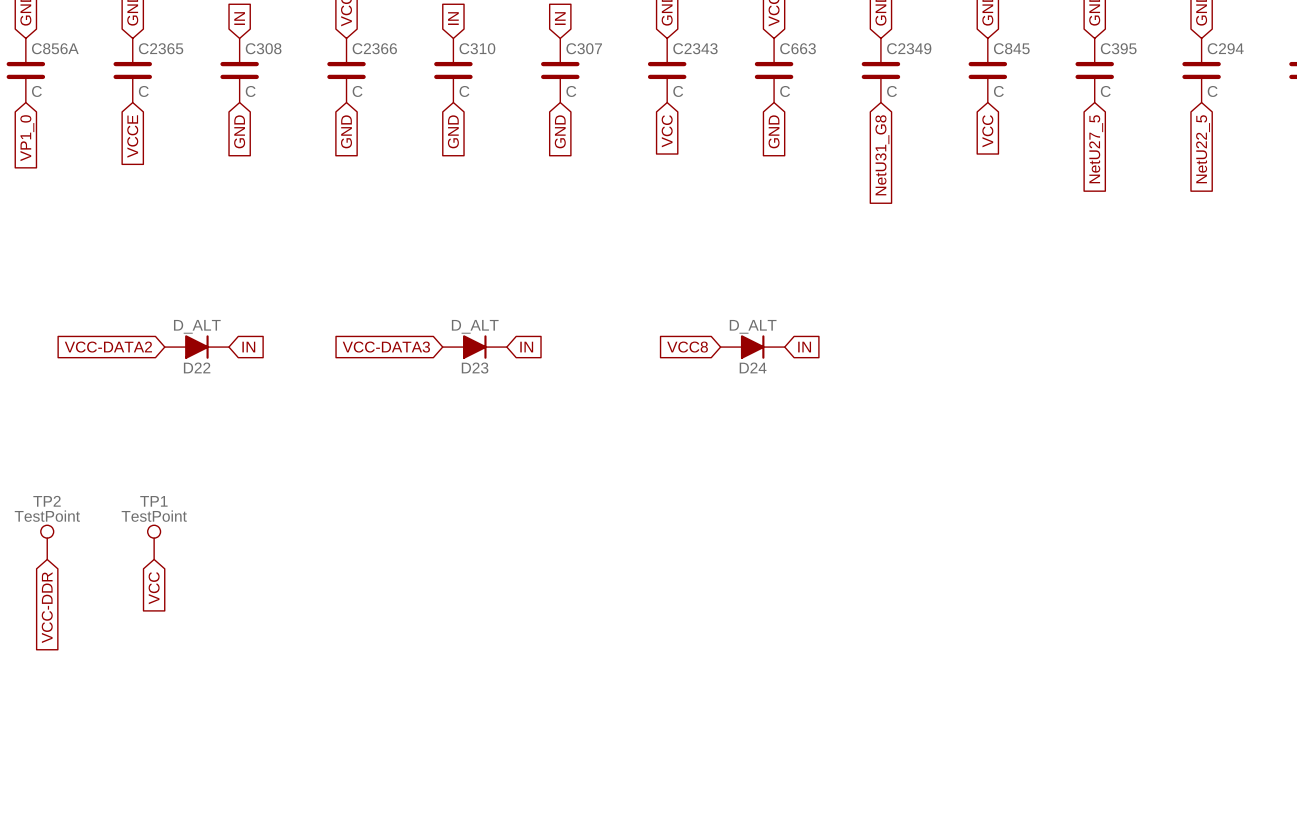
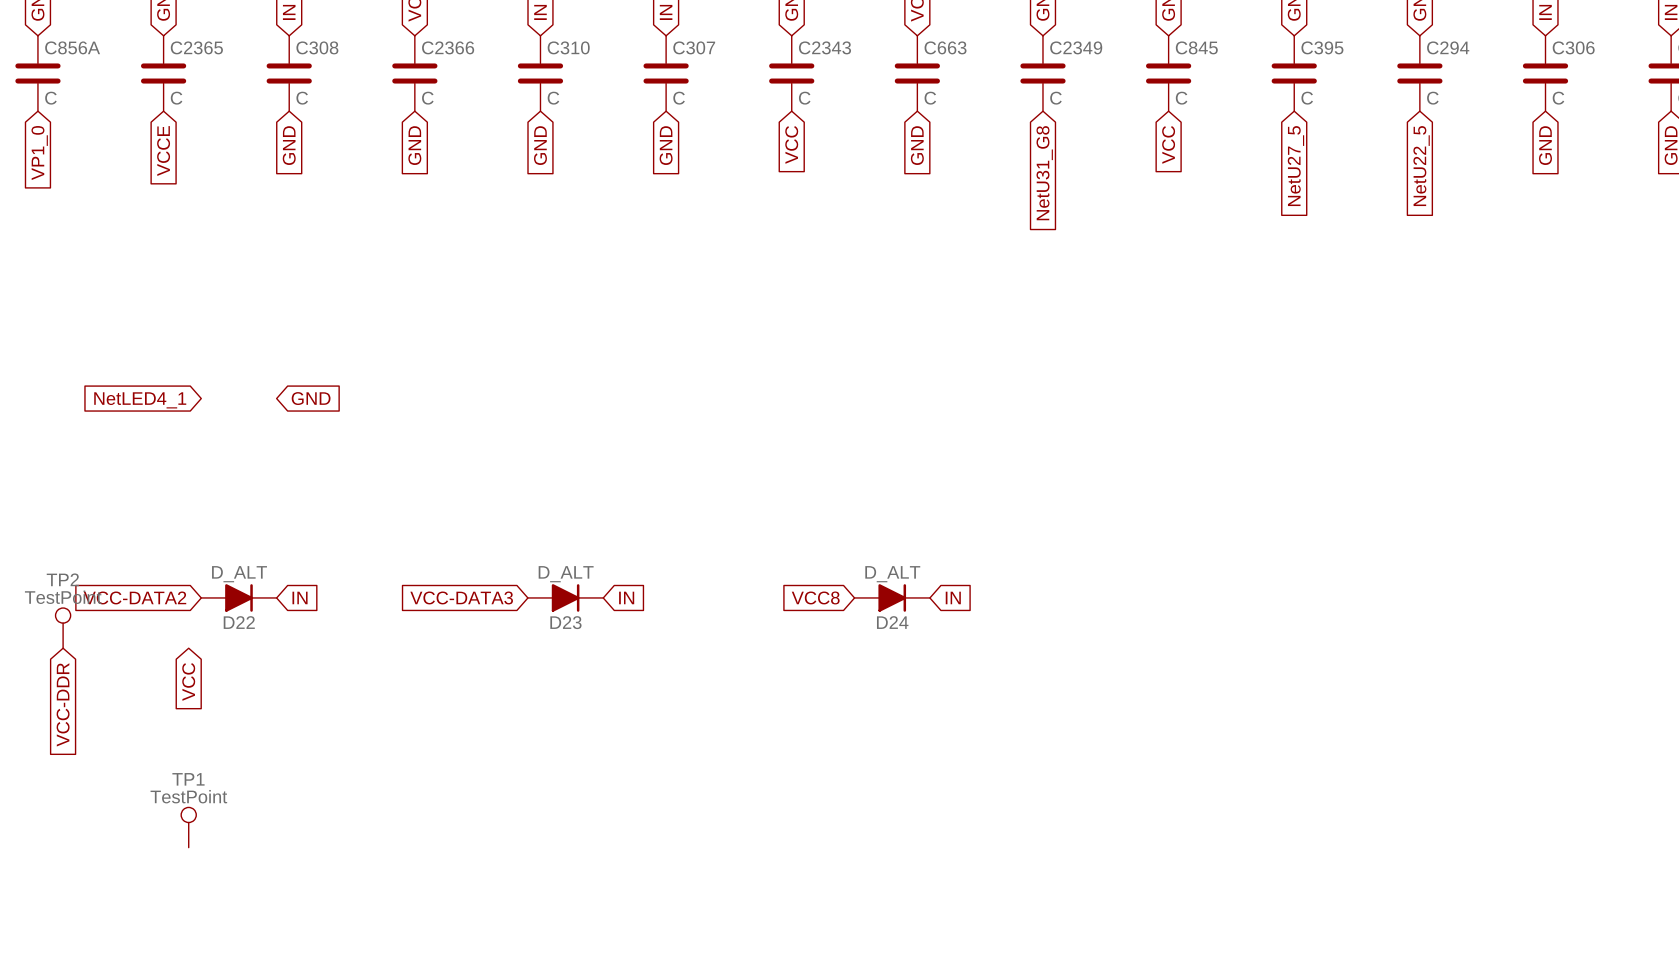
global label: VCC-DATA2 (108, 347) -> NetLED4_1 (140, 400)
D22 position: (196, 347) -> (238, 597)
global label: IN (248, 347) -> GND (311, 398)
global label position: VCC-DATA3 (386, 347) -> VCC-DATA3 (461, 597)
D23 position: (474, 347) -> (565, 597)
global label: IN (526, 347) -> none
global label position: VCC8 (687, 347) -> VCC8 (815, 597)
D24 position: (752, 347) -> (892, 597)
global label: IN (804, 347) -> none
global label: none -> VCC-DATA2 (134, 597)
global label: none -> IN (300, 597)
global label: none -> IN (626, 597)
global label: none -> IN (953, 597)
TP1 position: (154, 542) -> (188, 827)

